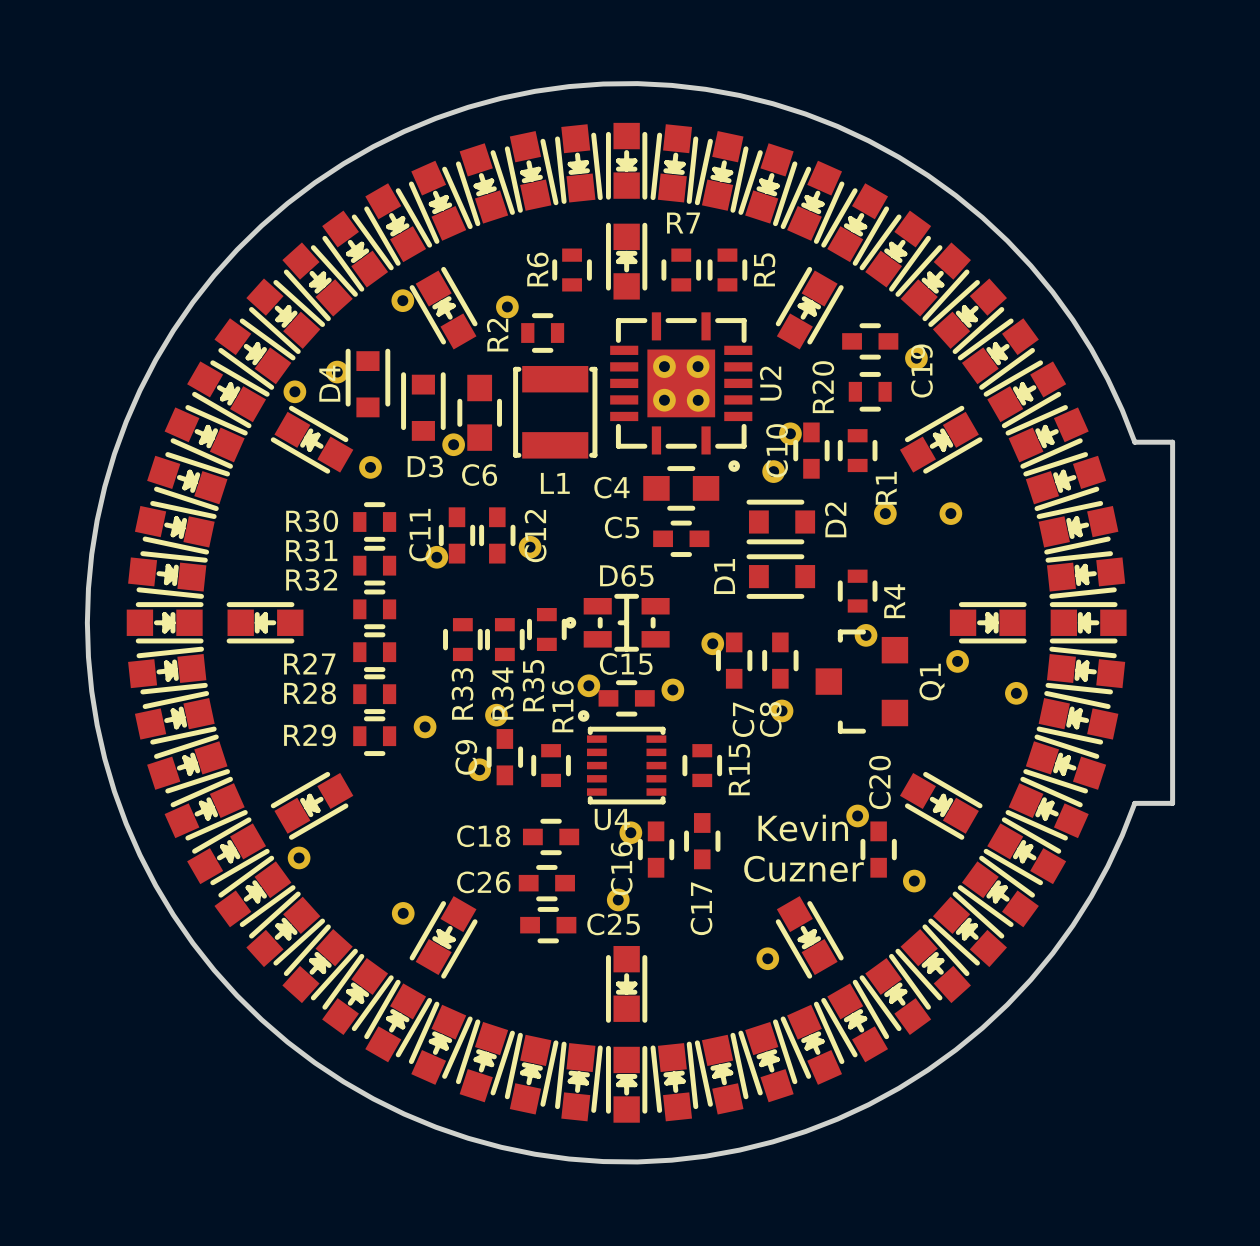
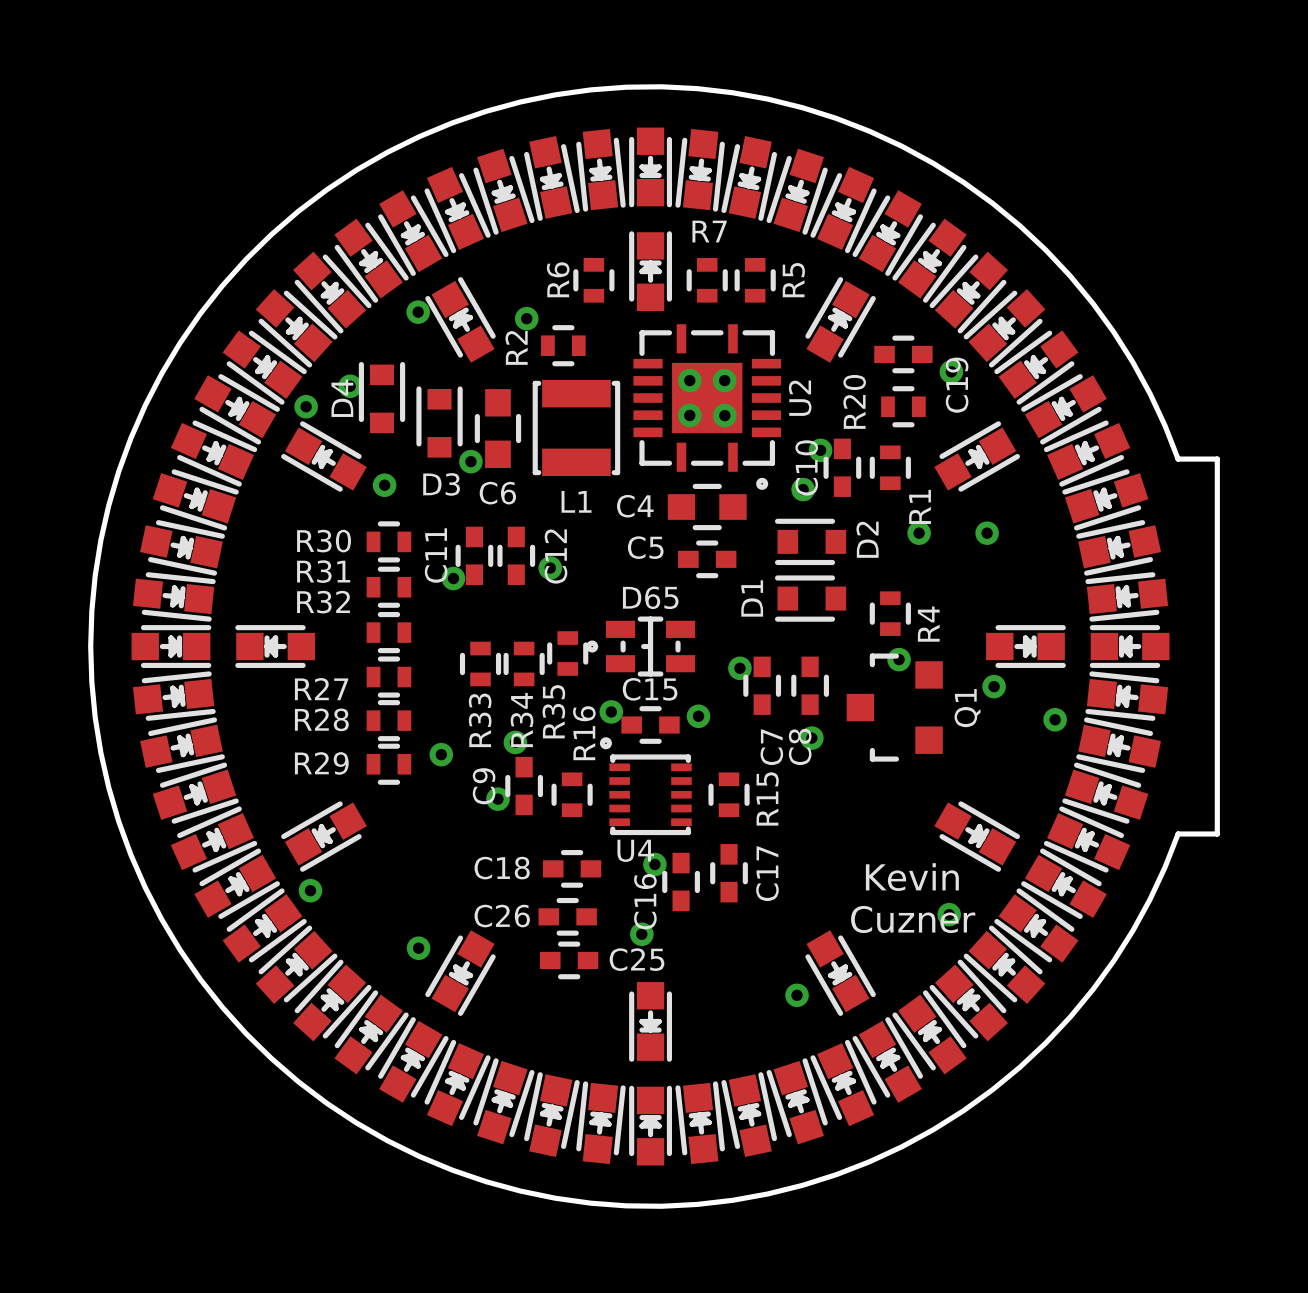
part: (857, 815) -> none
text position: Kevin (803, 828) -> Kevin (912, 877)
C20: (878, 849) -> none
text position: Cuzner (804, 868) -> Cuzner (913, 919)
C17 name position: C17 (701, 908) -> C17 (767, 873)

